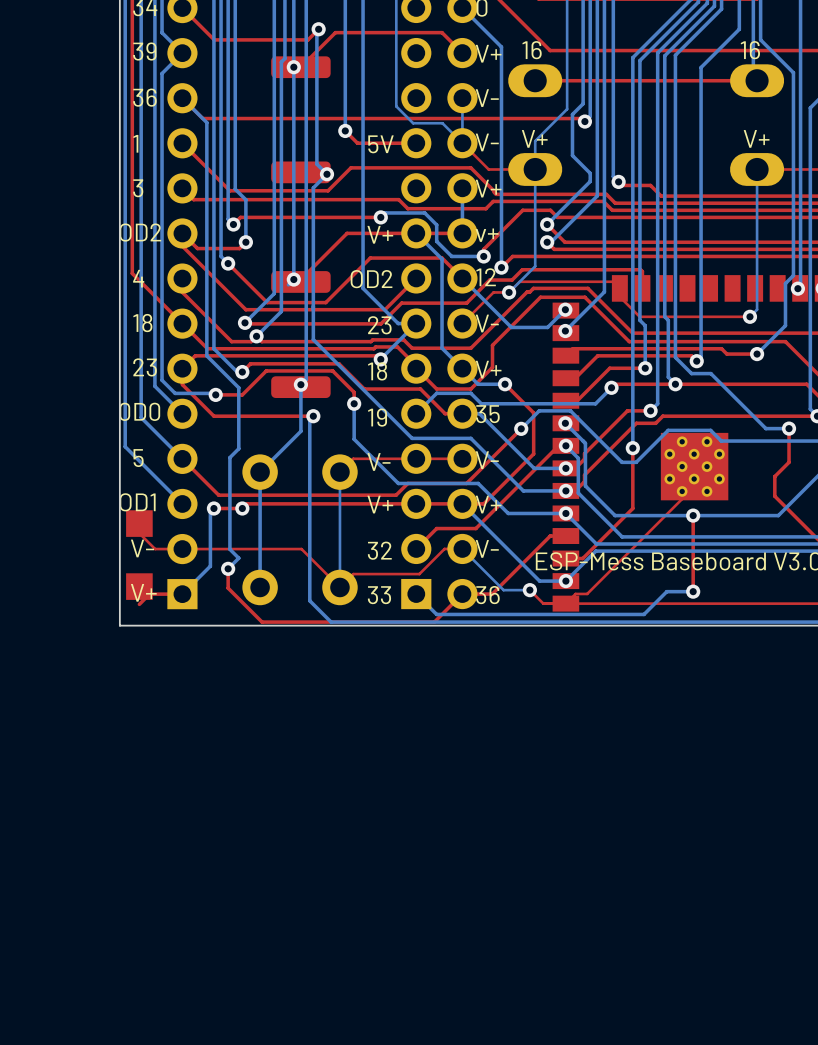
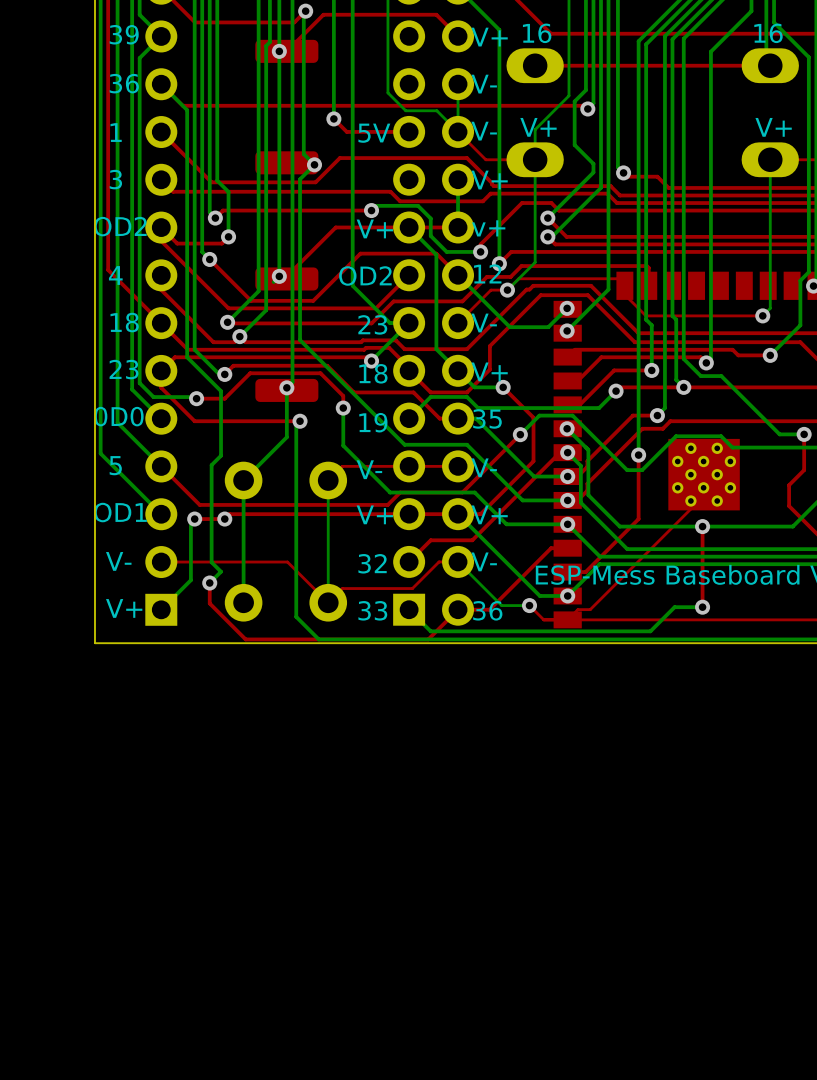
part: (139, 523) -> none
top track: (139, 533) (155, 549) (182, 549) -> none
part: (139, 586) -> none
top track: (182, 594) (149, 594) (139, 604) -> none

